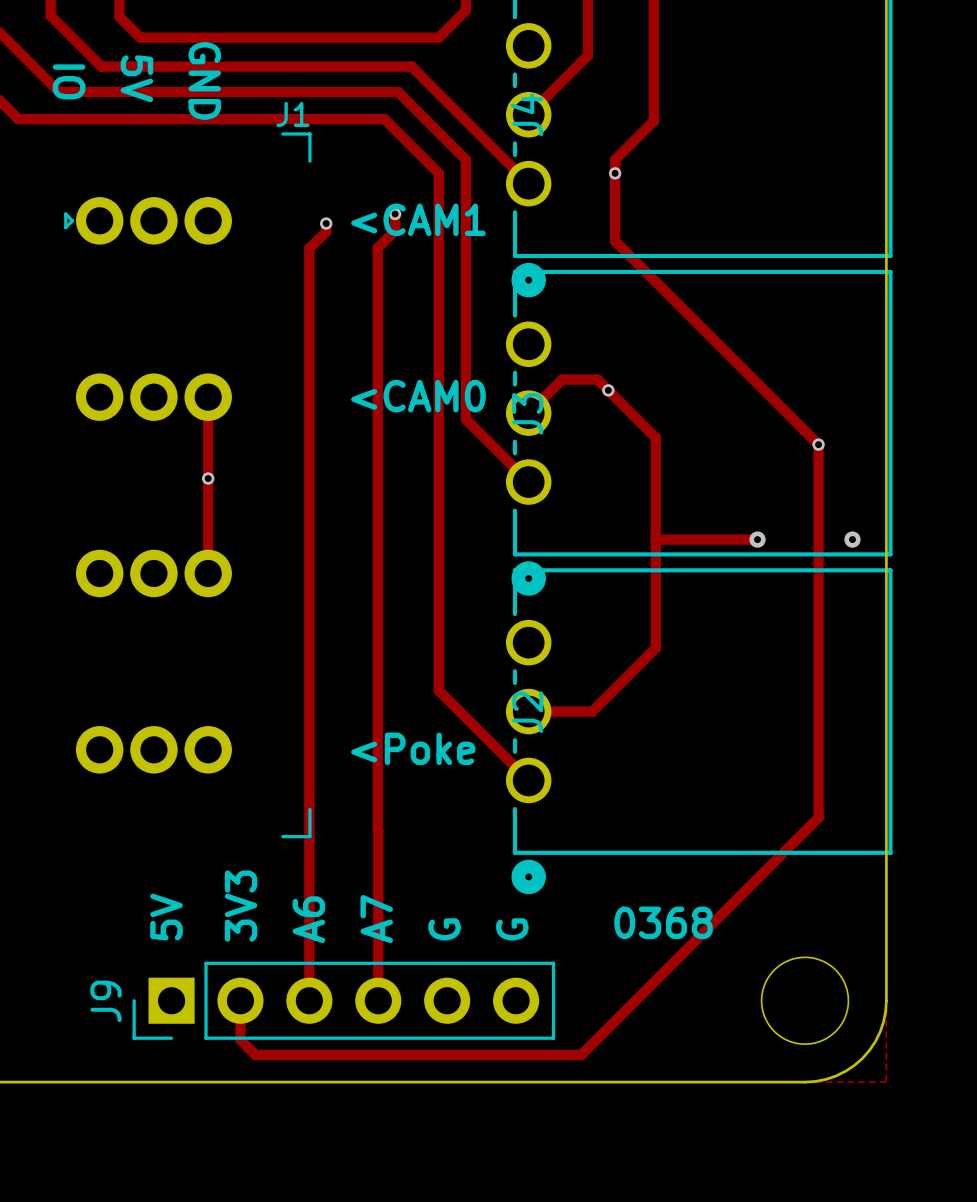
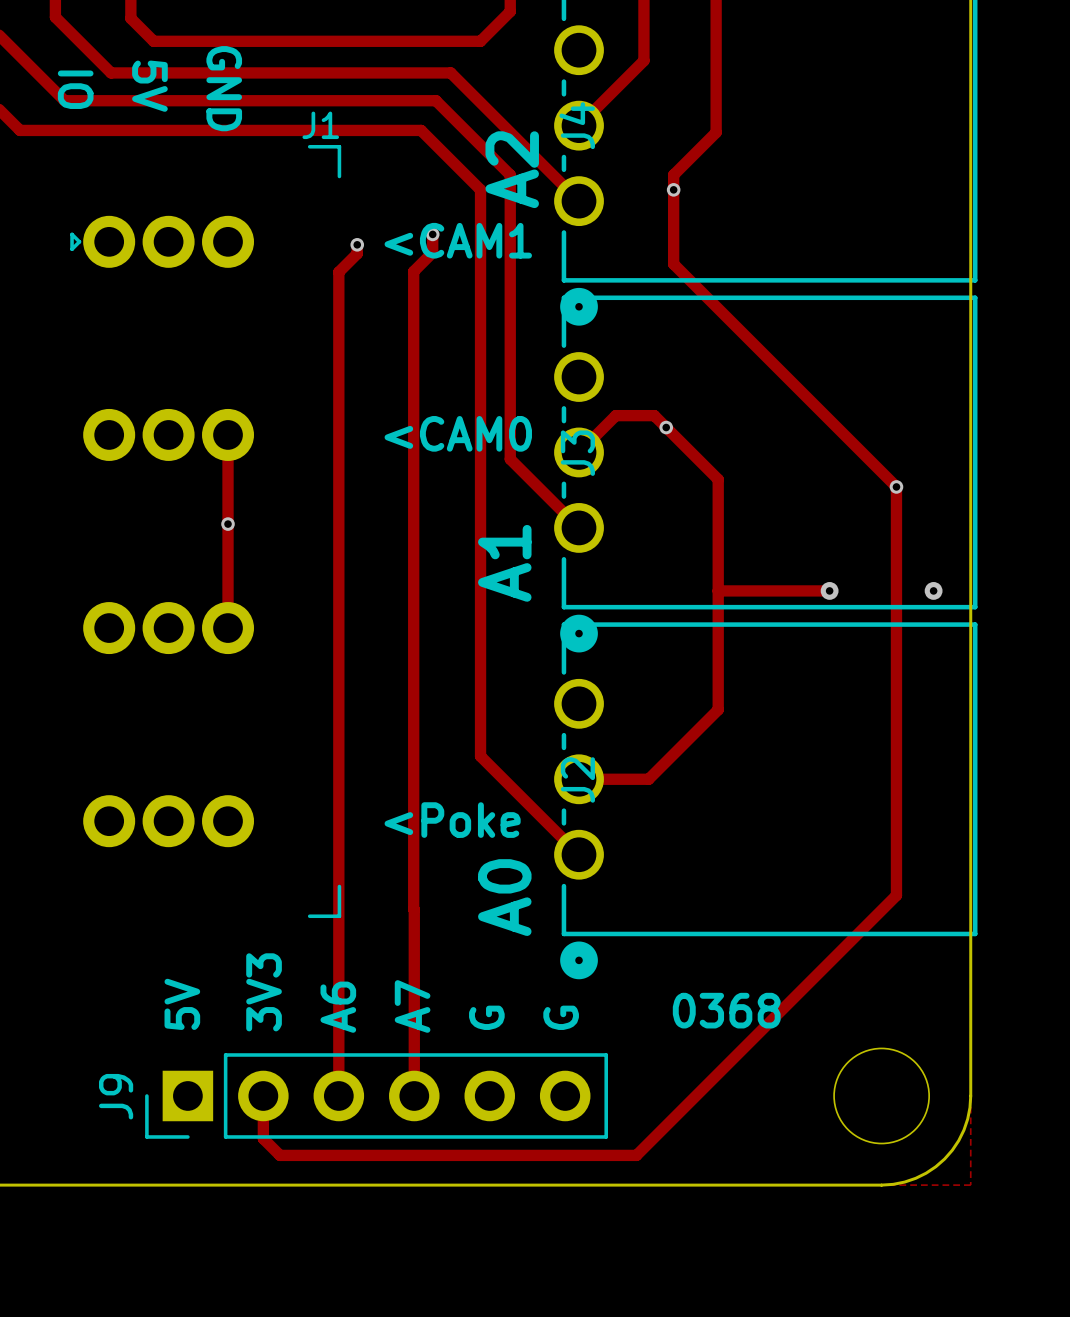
text: none -> A2 (512, 169)
text: none -> A1 (504, 563)
text: none -> A0 (504, 897)

